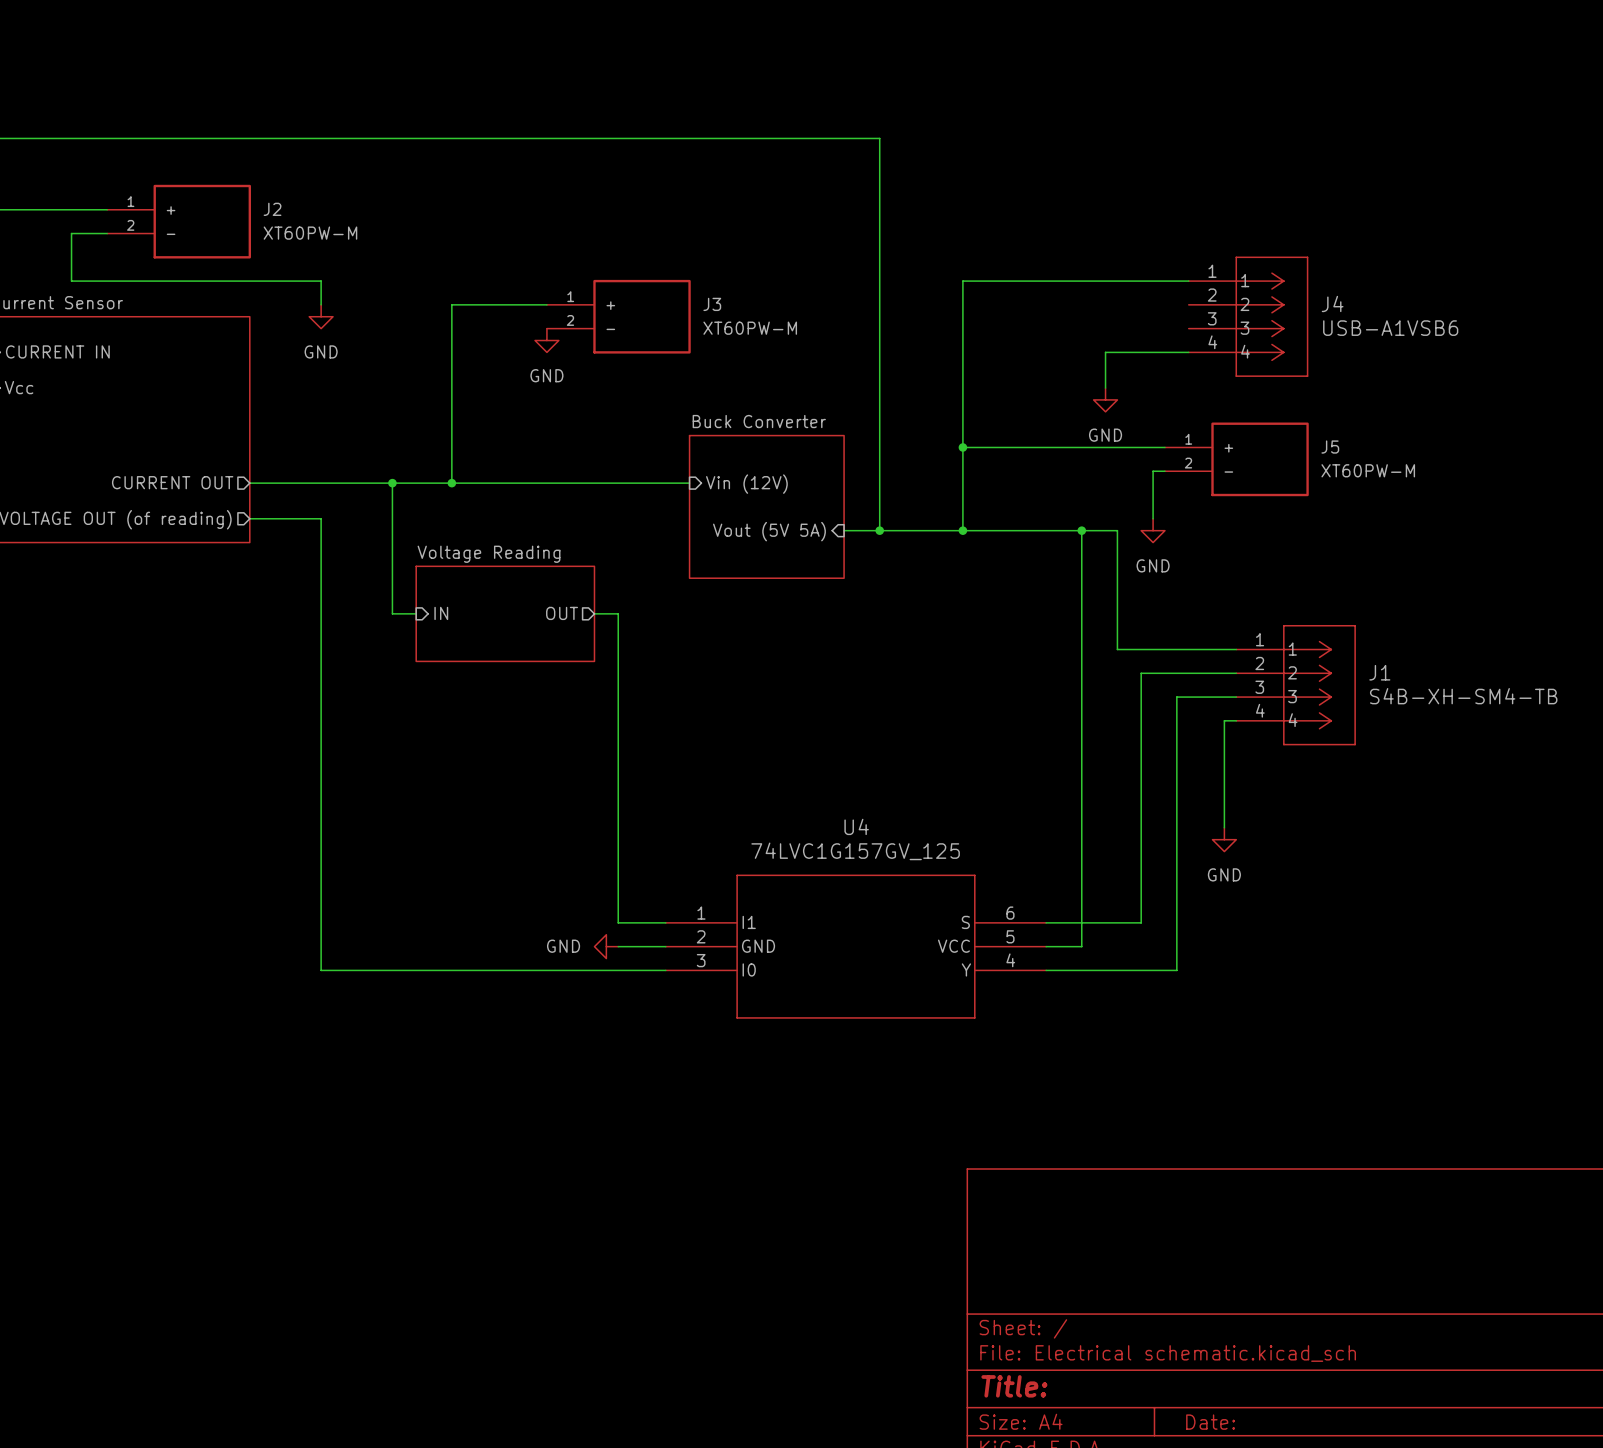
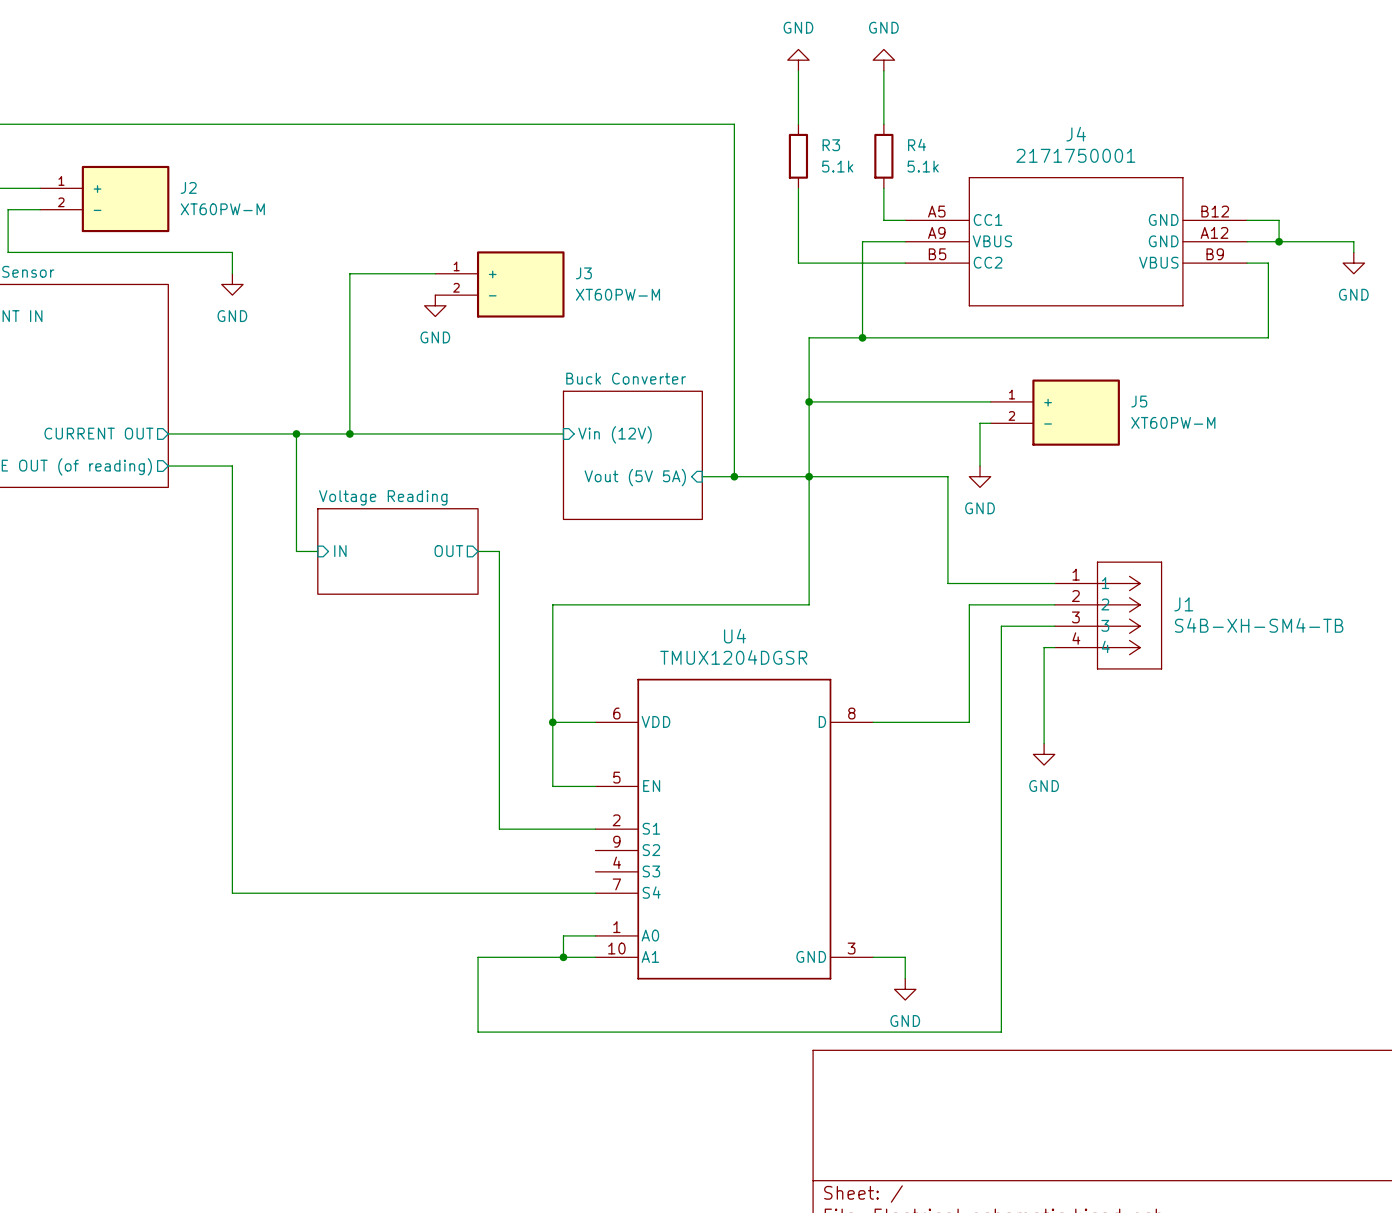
power symbol: none -> GND (798, 60)
power symbol: none -> GND (883, 60)
wire: none -> (798, 70) (798, 124)
wire: none -> (883, 70) (883, 124)
R3: none -> 5.1k (798, 156)
R4: none -> 5.1k (883, 156)
wire: none -> (798, 188) (798, 263) (905, 263)
wire: none -> (883, 188) (883, 220) (905, 220)
wire: none -> (1247, 220) (1279, 220) (1279, 241)
J4 symbol: [1188, 256, 1309, 377] -> [905, 177, 1248, 307]
wire: none -> (905, 241) (862, 241) (862, 337)
wire: none -> (1247, 241) (1353, 241) (1353, 252)
junction: none -> (1279, 241)
wire: (1188, 281) (962, 281) (962, 376) -> (1247, 263) (1268, 263) (1268, 337) (809, 337)
power symbol: none -> GND (1353, 263)
J4 name position: J4 (1332, 303) -> J4 (1076, 134)
J4 value: USB-A1VSB6 (1390, 328) -> 2171750001 (1075, 155)
wire: (1188, 352) (1105, 352) (1105, 388) -> none
junction: none -> (862, 337)
power symbol: GND (1105, 399) -> none
wire: none -> (809, 476) (809, 604) (552, 604) (552, 786) (595, 786)
wire: (1081, 530) (1081, 946) (1046, 946) -> none
junction: (1081, 530) -> none
junction: none -> (552, 722)
wire: (1141, 804) (1141, 922) (1046, 922) -> (969, 722) (873, 722)
U4 name position: U4 (856, 826) -> U4 (734, 636)
U4 value: 74LVC1G157GV_125 (855, 851) -> TMUX1204DGSR (733, 657)
U4 symbol: [665, 874, 1047, 1019] -> [595, 678, 874, 980]
power symbol: GND (606, 946) -> none
wire: (618, 946) (665, 946) -> (552, 722) (595, 722)
wire: (321, 970) (665, 970) -> (232, 871) (232, 893) (595, 893)
wire: (1046, 970) (1176, 970) -> (595, 957) (478, 957) (478, 1032) (1001, 1032) (1001, 871)
wire: none -> (595, 935) (563, 935) (563, 957)
junction: none -> (563, 957)
wire: none -> (873, 957) (905, 957) (905, 978)
power symbol: none -> GND (905, 989)

